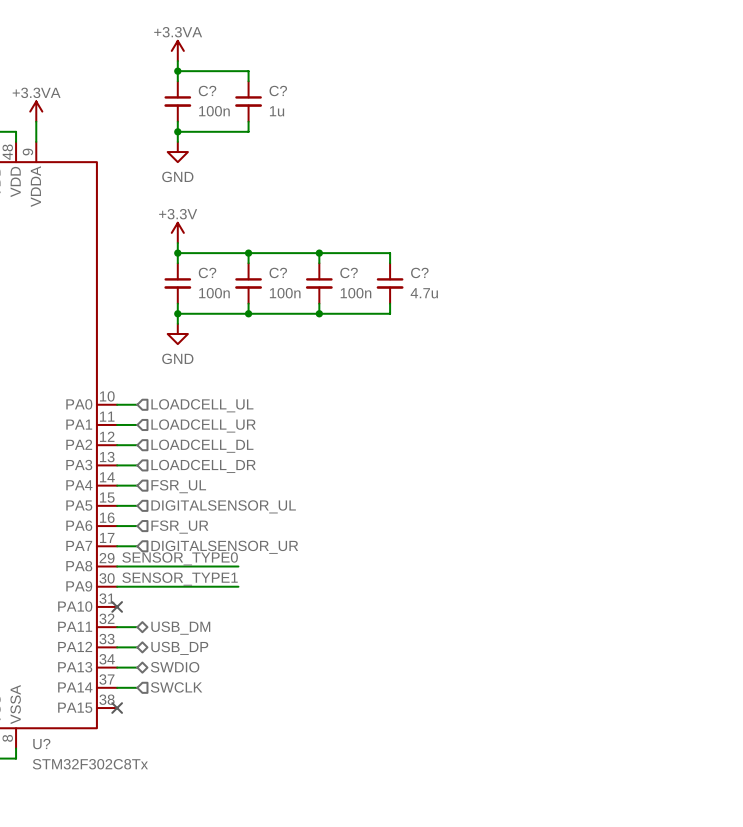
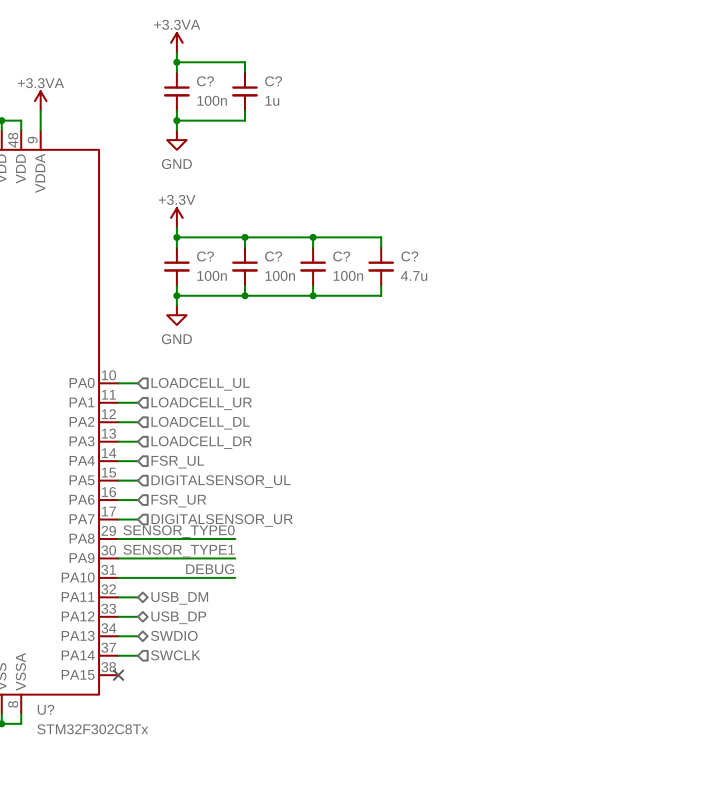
label: none -> DEBUG (210, 569)
wire: none -> (118, 577) (235, 577)
no-connect mark: (117, 606) -> none

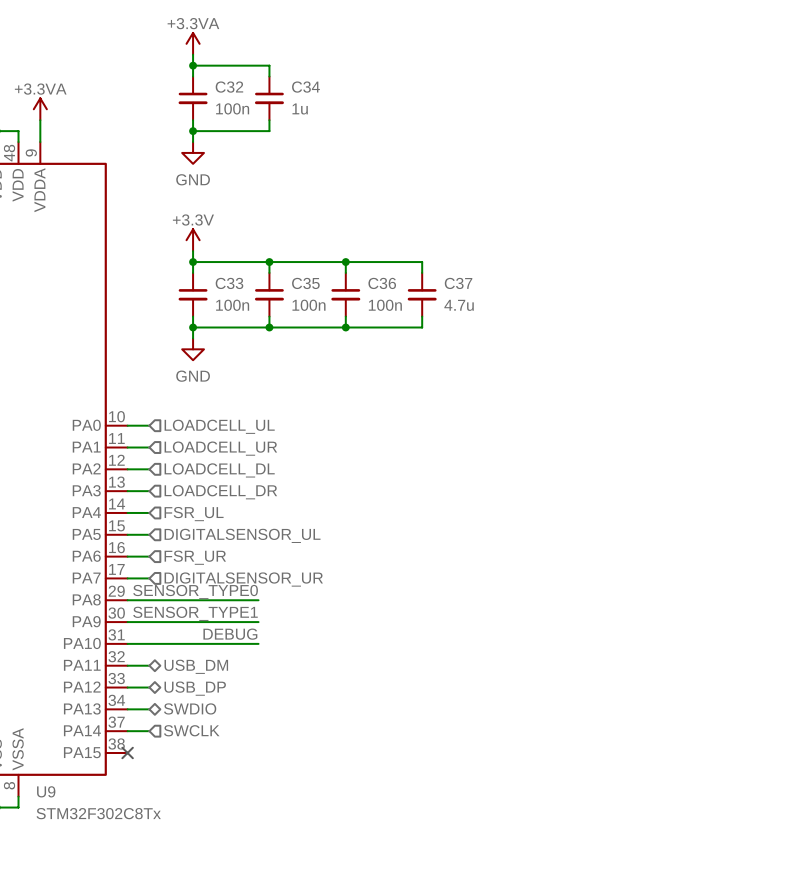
C? name: C? (205, 81) -> C32 (229, 87)
C? name: C? (273, 81) -> C34 (305, 87)
C? name: C? (205, 256) -> C33 (229, 283)
C? name: C? (273, 256) -> C35 (305, 283)
C? name: C? (341, 256) -> C36 (382, 283)
C? name: C? (409, 256) -> C37 (458, 283)
U? name: U? (46, 709) -> U9 (46, 791)

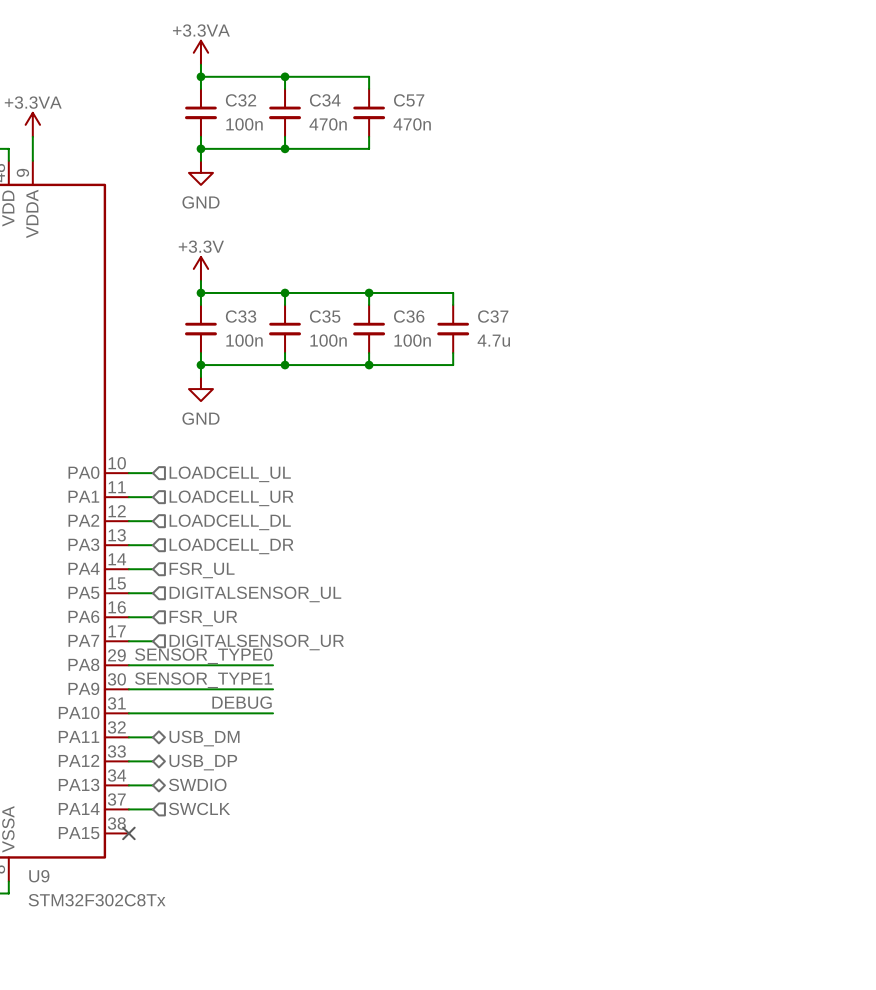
wire: none -> (285, 76) (369, 76) (369, 88)
junction: none -> (285, 76)
C57: none -> 470n (369, 112)
C34 value: 1u (300, 108) -> 470n (328, 124)
wire: none -> (369, 136) (369, 148) (285, 148)
junction: none -> (285, 148)

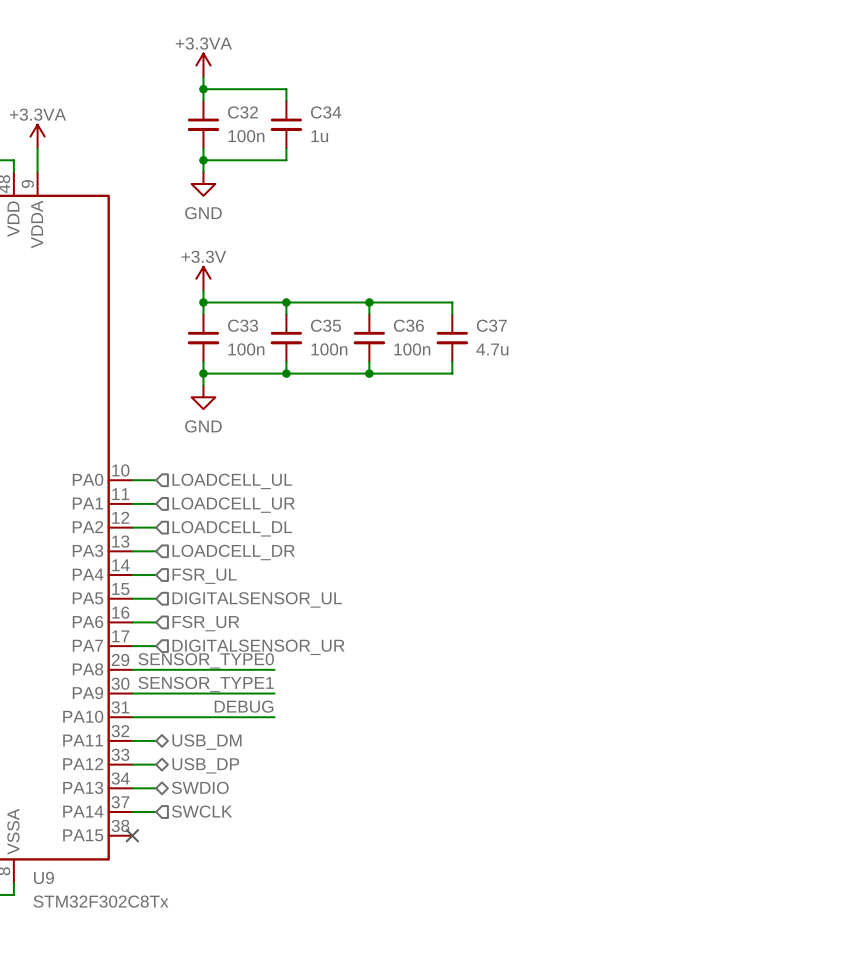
wire: (285, 76) (369, 76) (369, 88) -> none
junction: (285, 76) -> none
C57: 470n (369, 112) -> none
C34 value: 470n (328, 124) -> 1u (319, 136)
wire: (369, 136) (369, 148) (285, 148) -> none
junction: (285, 148) -> none

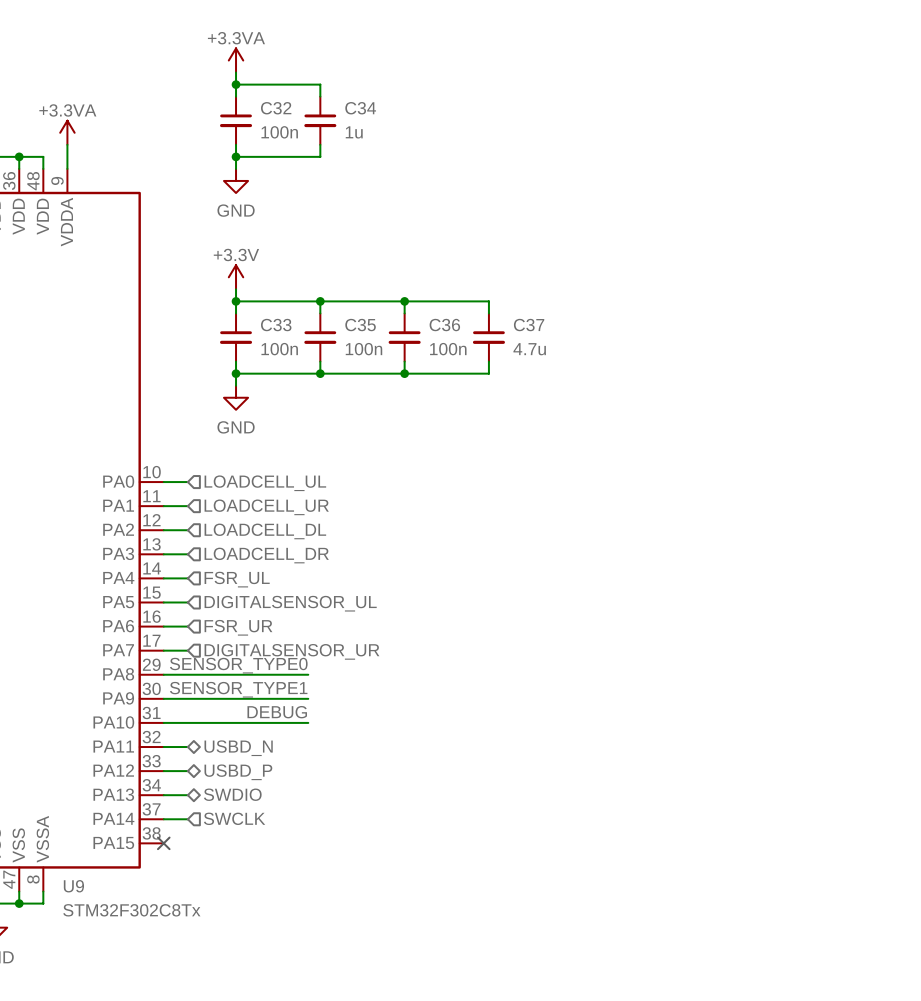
hierarchical label: USB_DM (206, 742) -> USBD_N (238, 748)
hierarchical label: USB_DP (205, 765) -> USBD_P (238, 772)

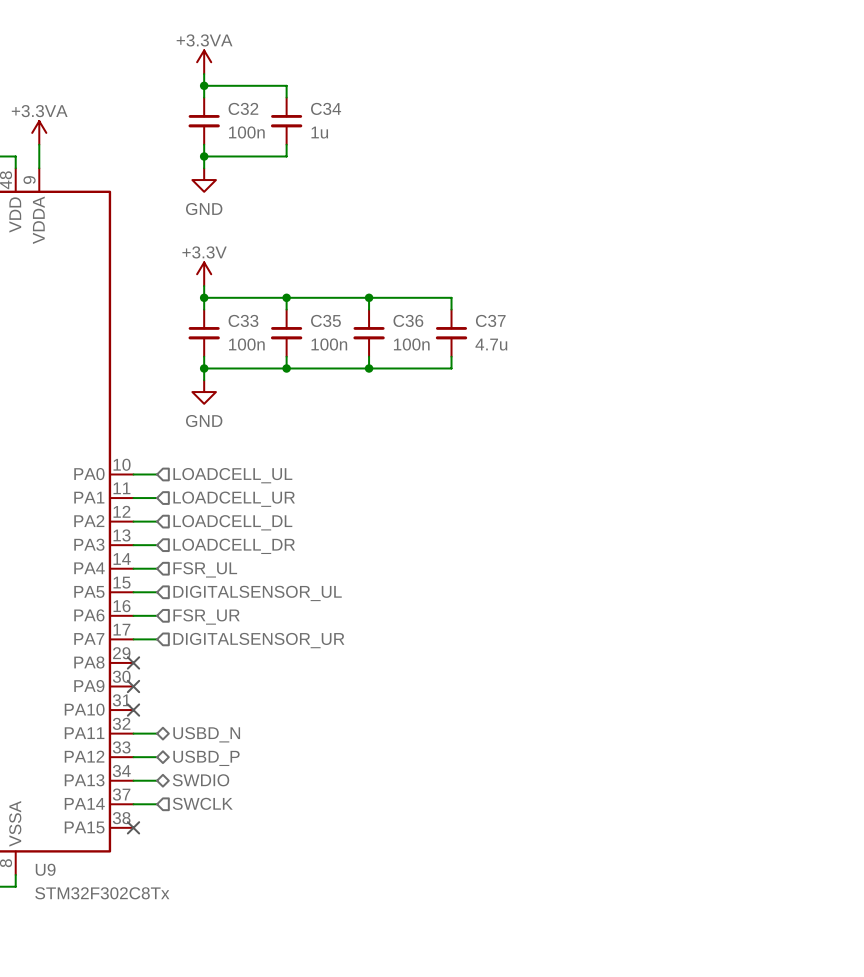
label: SENSOR_TYPE0 (238, 665) -> none
wire: (163, 674) (308, 674) -> none
no-connect mark: none -> (133, 662)
label: SENSOR_TYPE1 (238, 689) -> none
wire: (163, 698) (308, 698) -> none
no-connect mark: none -> (133, 686)
label: DEBUG (277, 712) -> none
wire: (163, 722) (308, 722) -> none
no-connect mark: none -> (133, 710)

